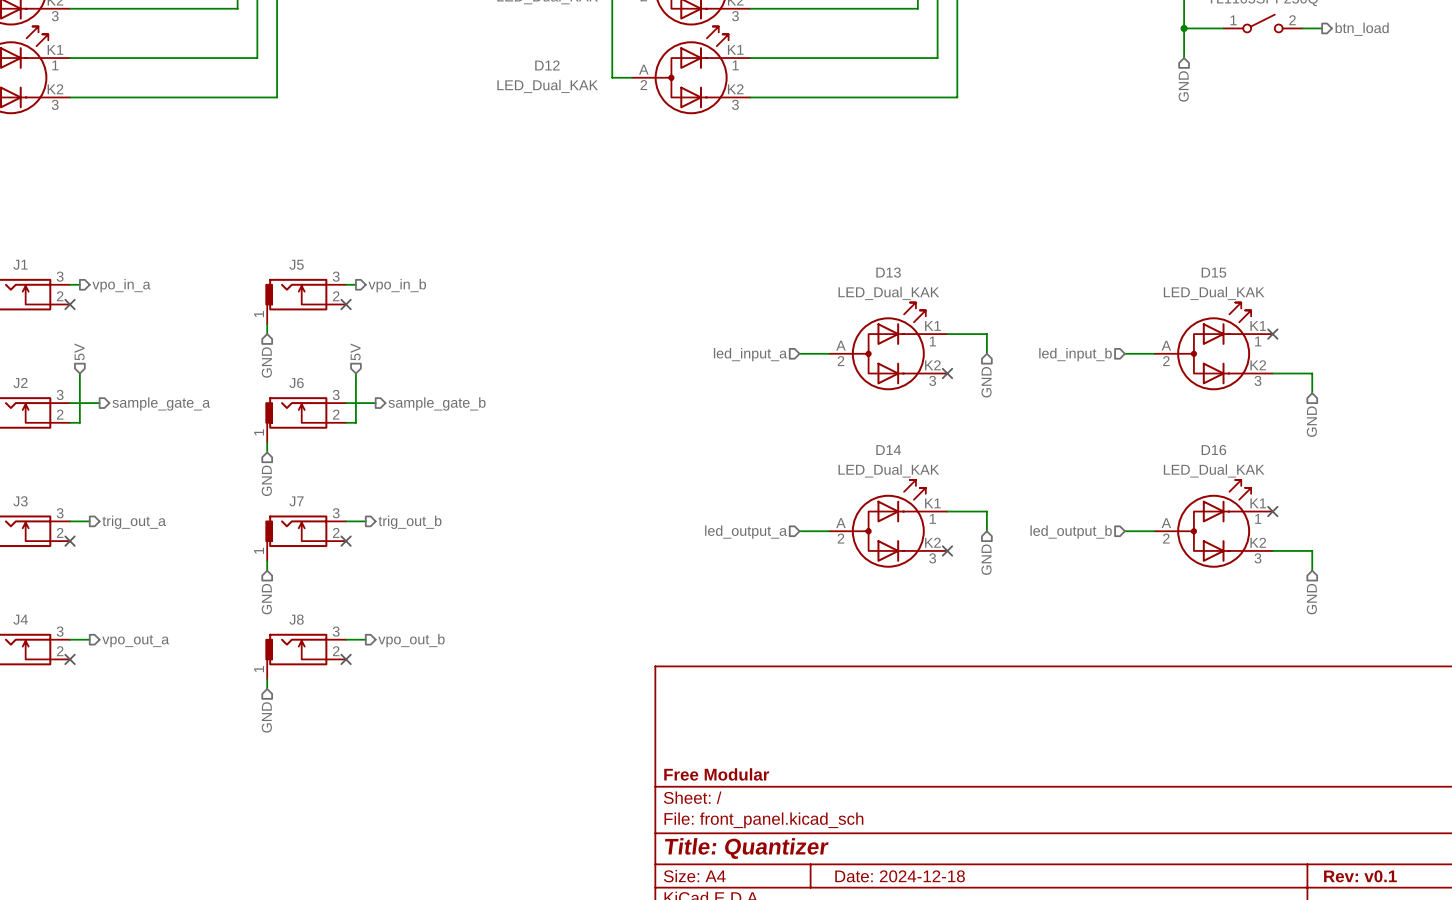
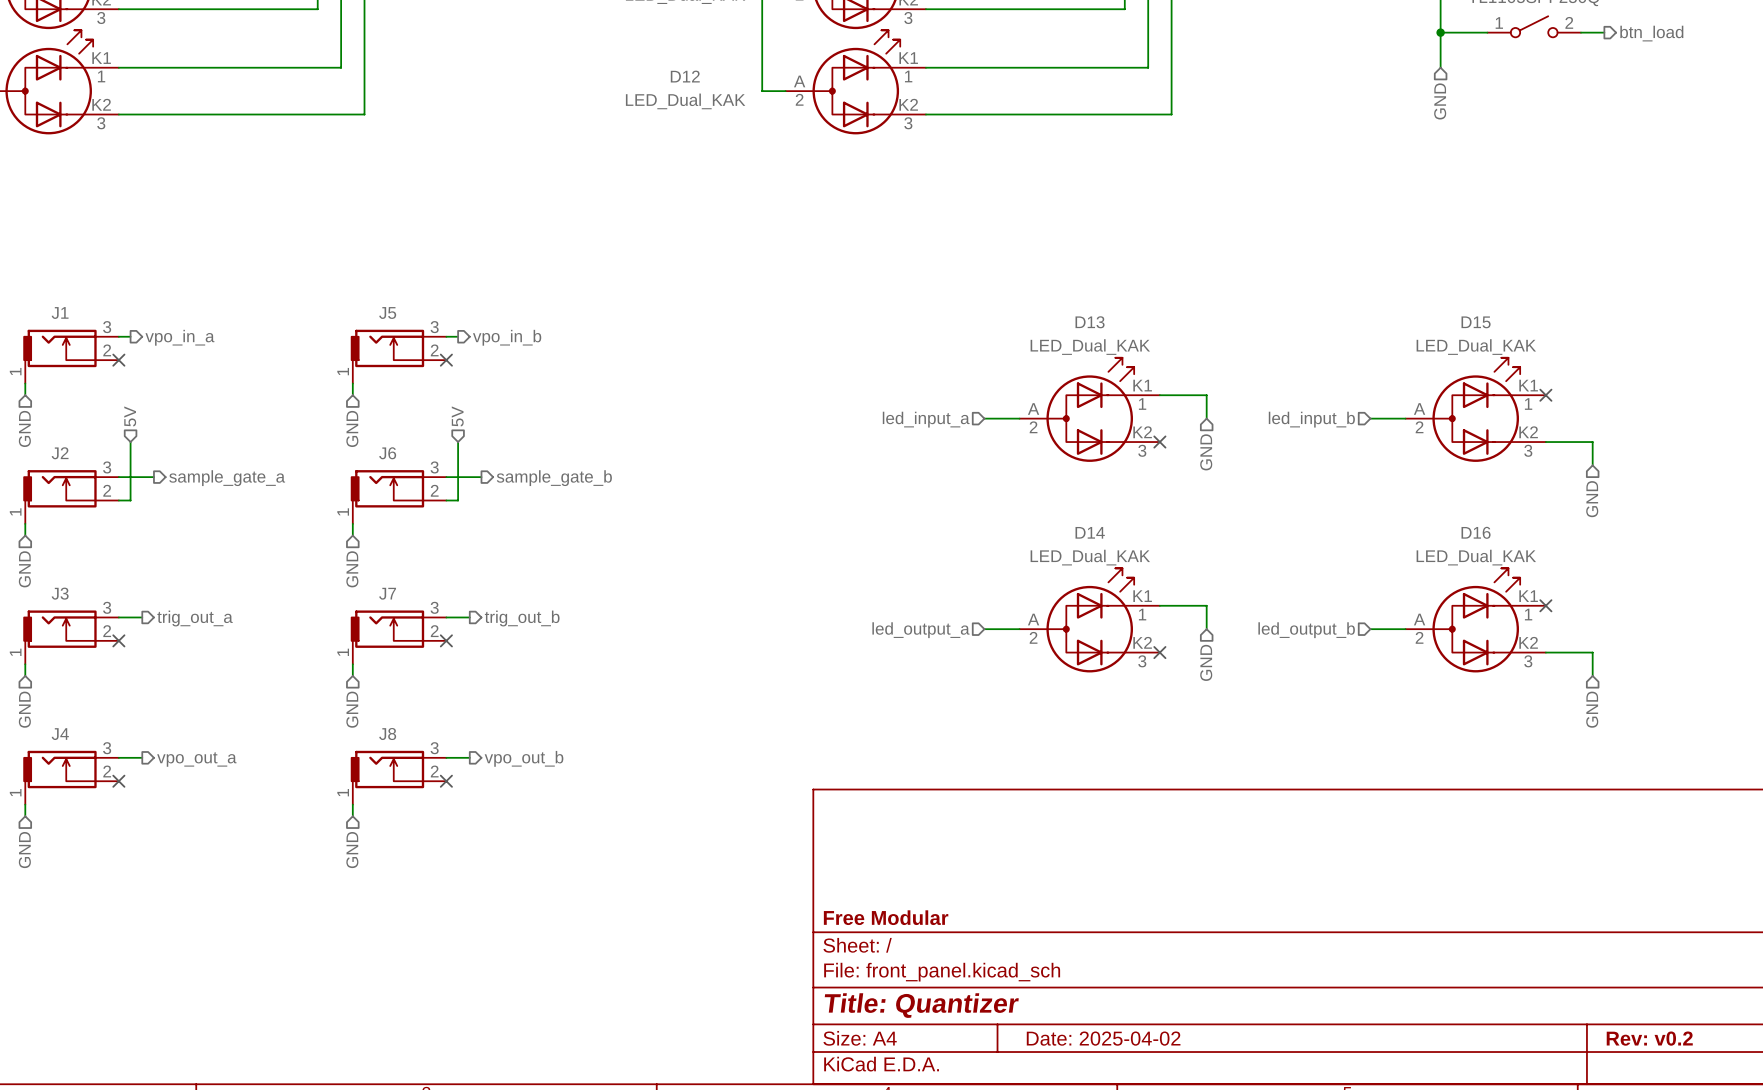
title block: Date: 2024-12-18 (900, 876) -> Date: 2025-04-02 (1103, 1038)
title block: Rev: v0.1 (1360, 876) -> Rev: v0.2 (1649, 1038)

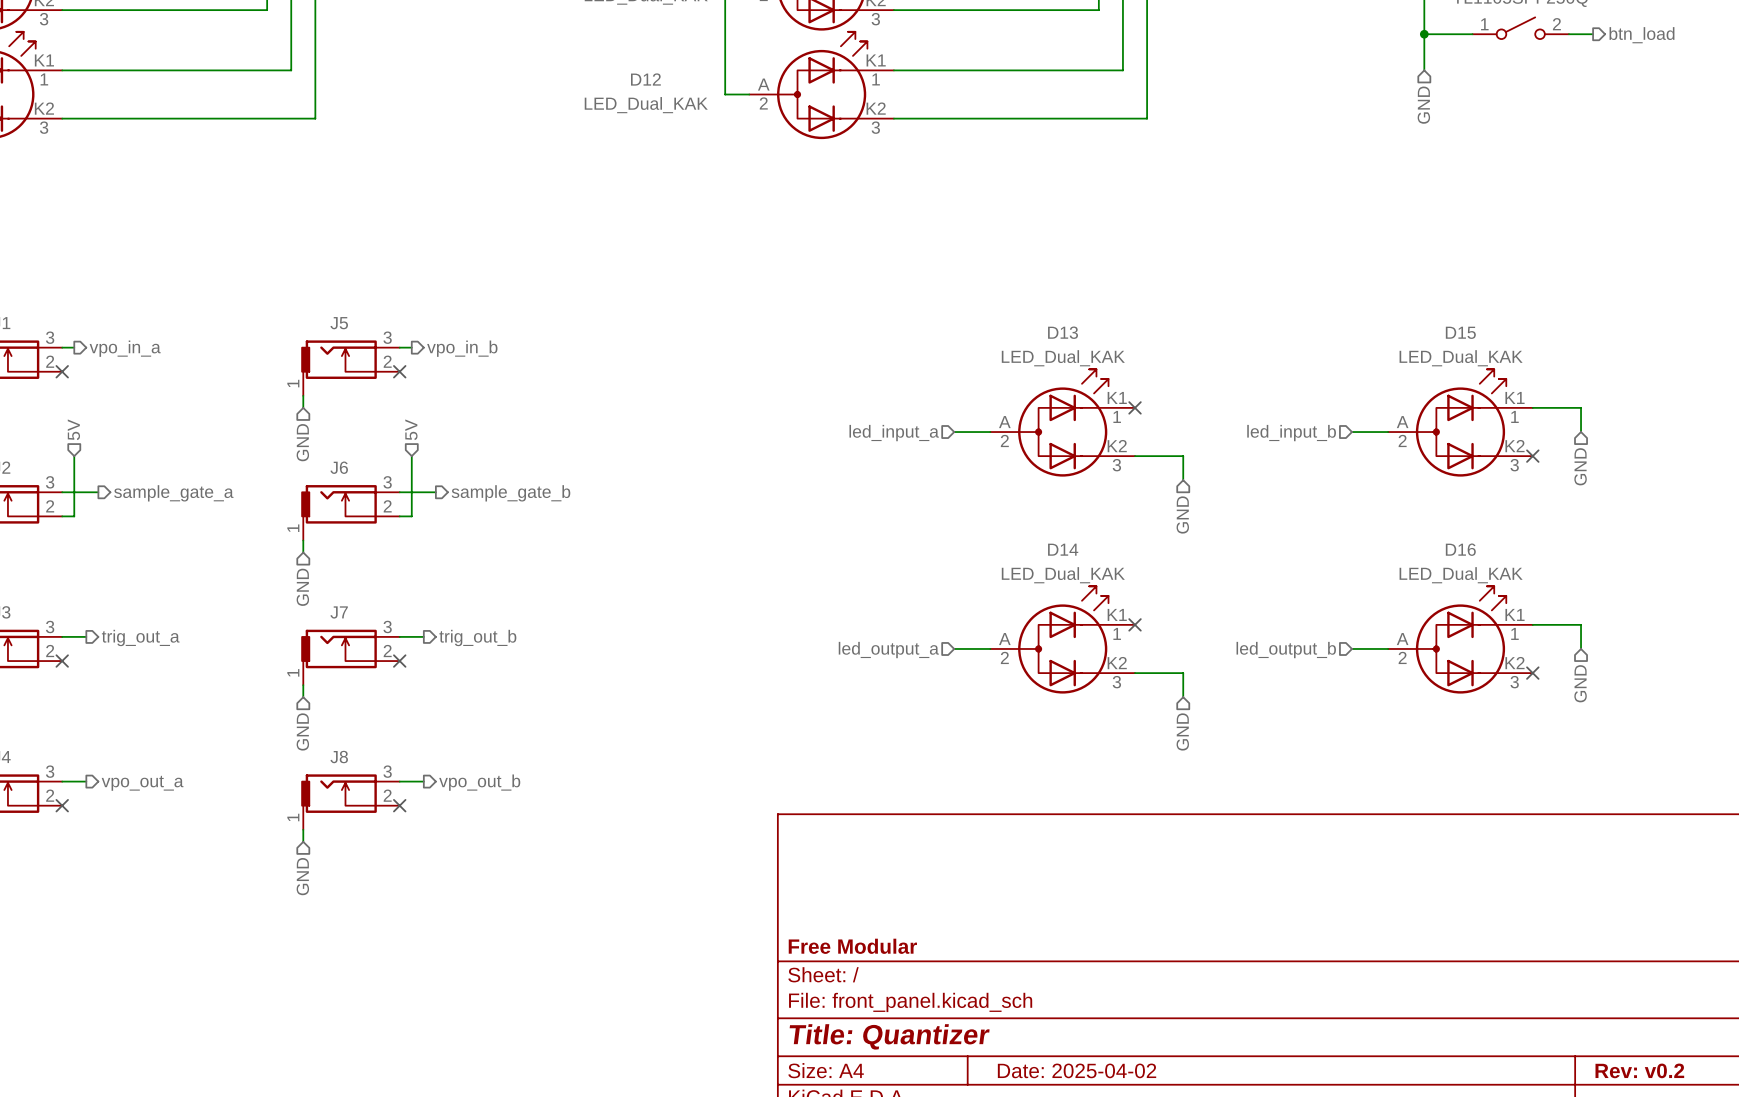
wire: (1159, 395) (1206, 395) (1206, 418) -> (1135, 456) (1183, 456) (1183, 480)
no-connect mark position: (1545, 395) -> (1532, 456)
no-connect mark position: (1159, 442) -> (1135, 407)
wire: (1545, 442) (1592, 442) (1592, 465) -> (1532, 407) (1581, 407) (1581, 432)
hierarchical label position: GND (1206, 452) -> GND (1182, 514)
hierarchical label position: GND (1592, 499) -> GND (1580, 466)
wire: (1159, 605) (1206, 605) (1206, 629) -> (1135, 673) (1183, 673) (1183, 697)
no-connect mark position: (1545, 605) -> (1532, 673)
no-connect mark position: (1159, 652) -> (1135, 624)
wire: (1545, 652) (1592, 652) (1592, 675) -> (1532, 624) (1581, 624) (1581, 648)
hierarchical label position: GND (1206, 662) -> GND (1182, 731)
hierarchical label position: GND (1592, 709) -> GND (1580, 683)

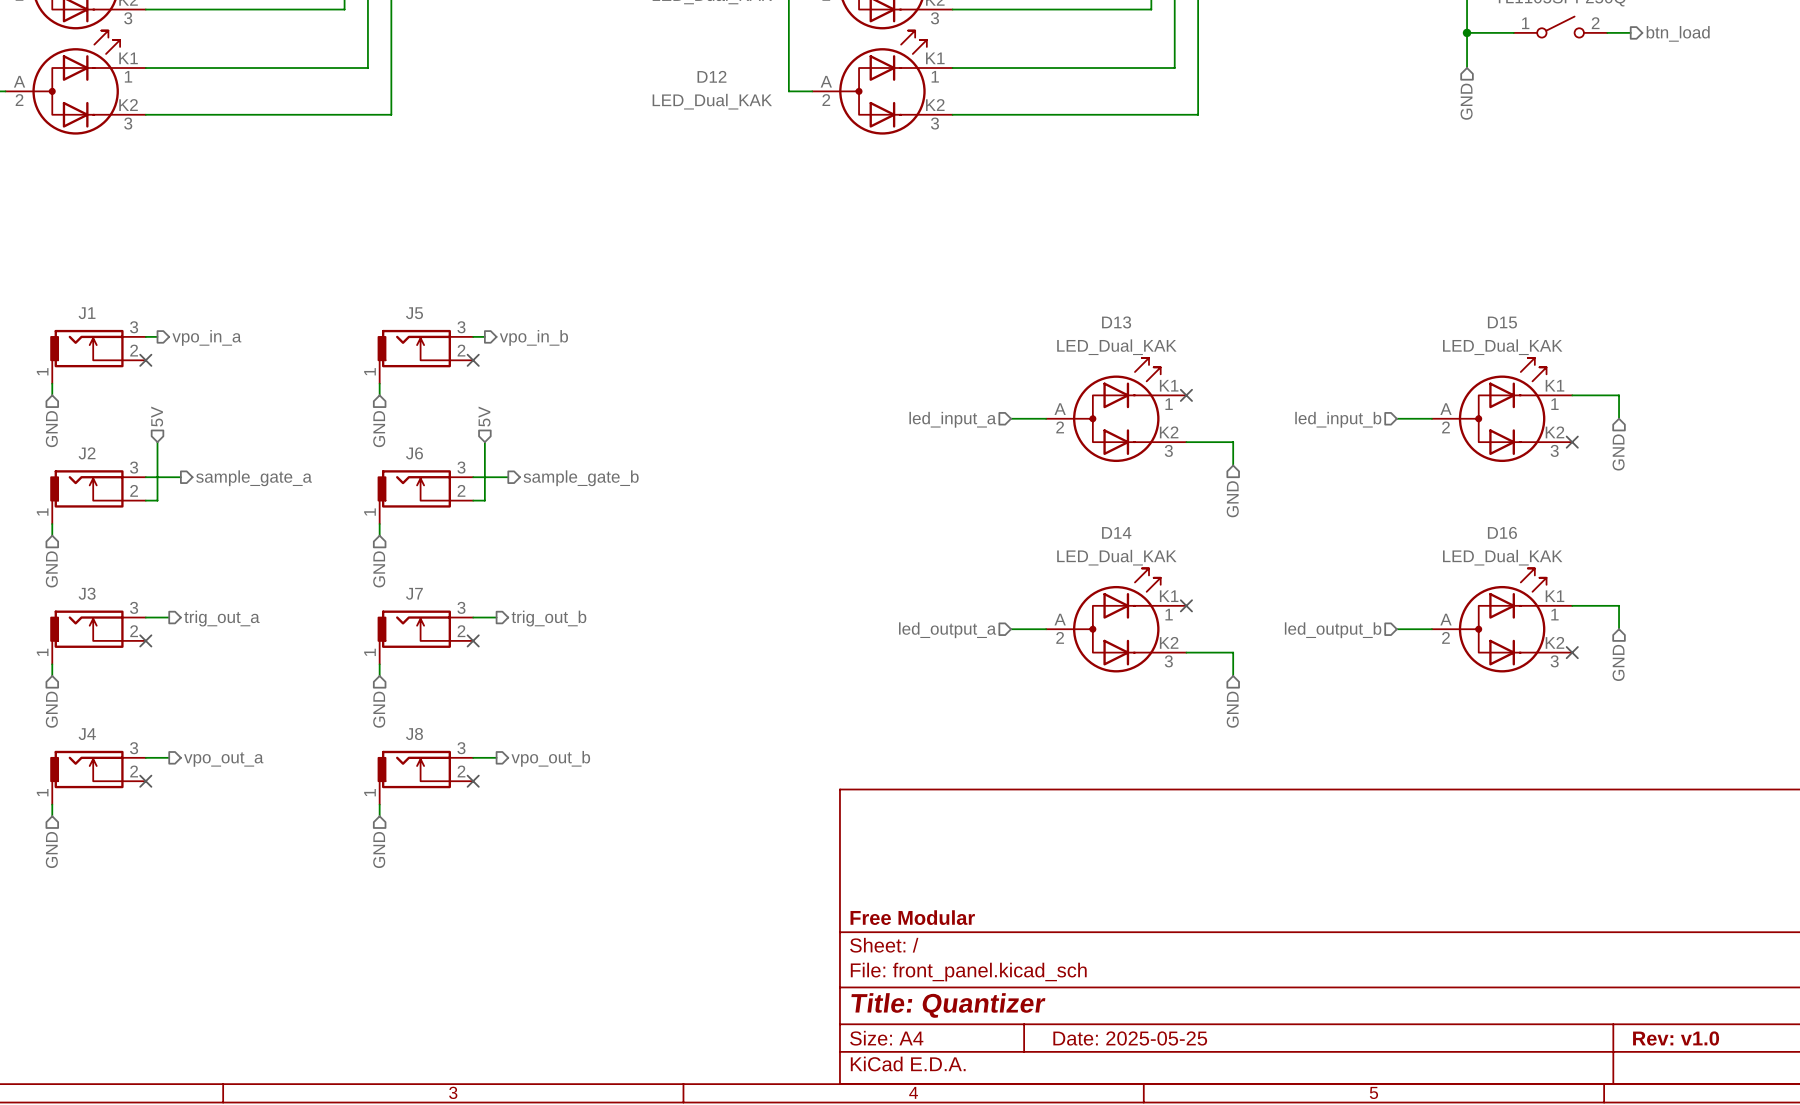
title block: Date: 2025-04-02 (1077, 1070) -> Date: 2025-05-25 (1130, 1038)
title block: Rev: v0.2 (1639, 1070) -> Rev: v1.0 (1676, 1038)

